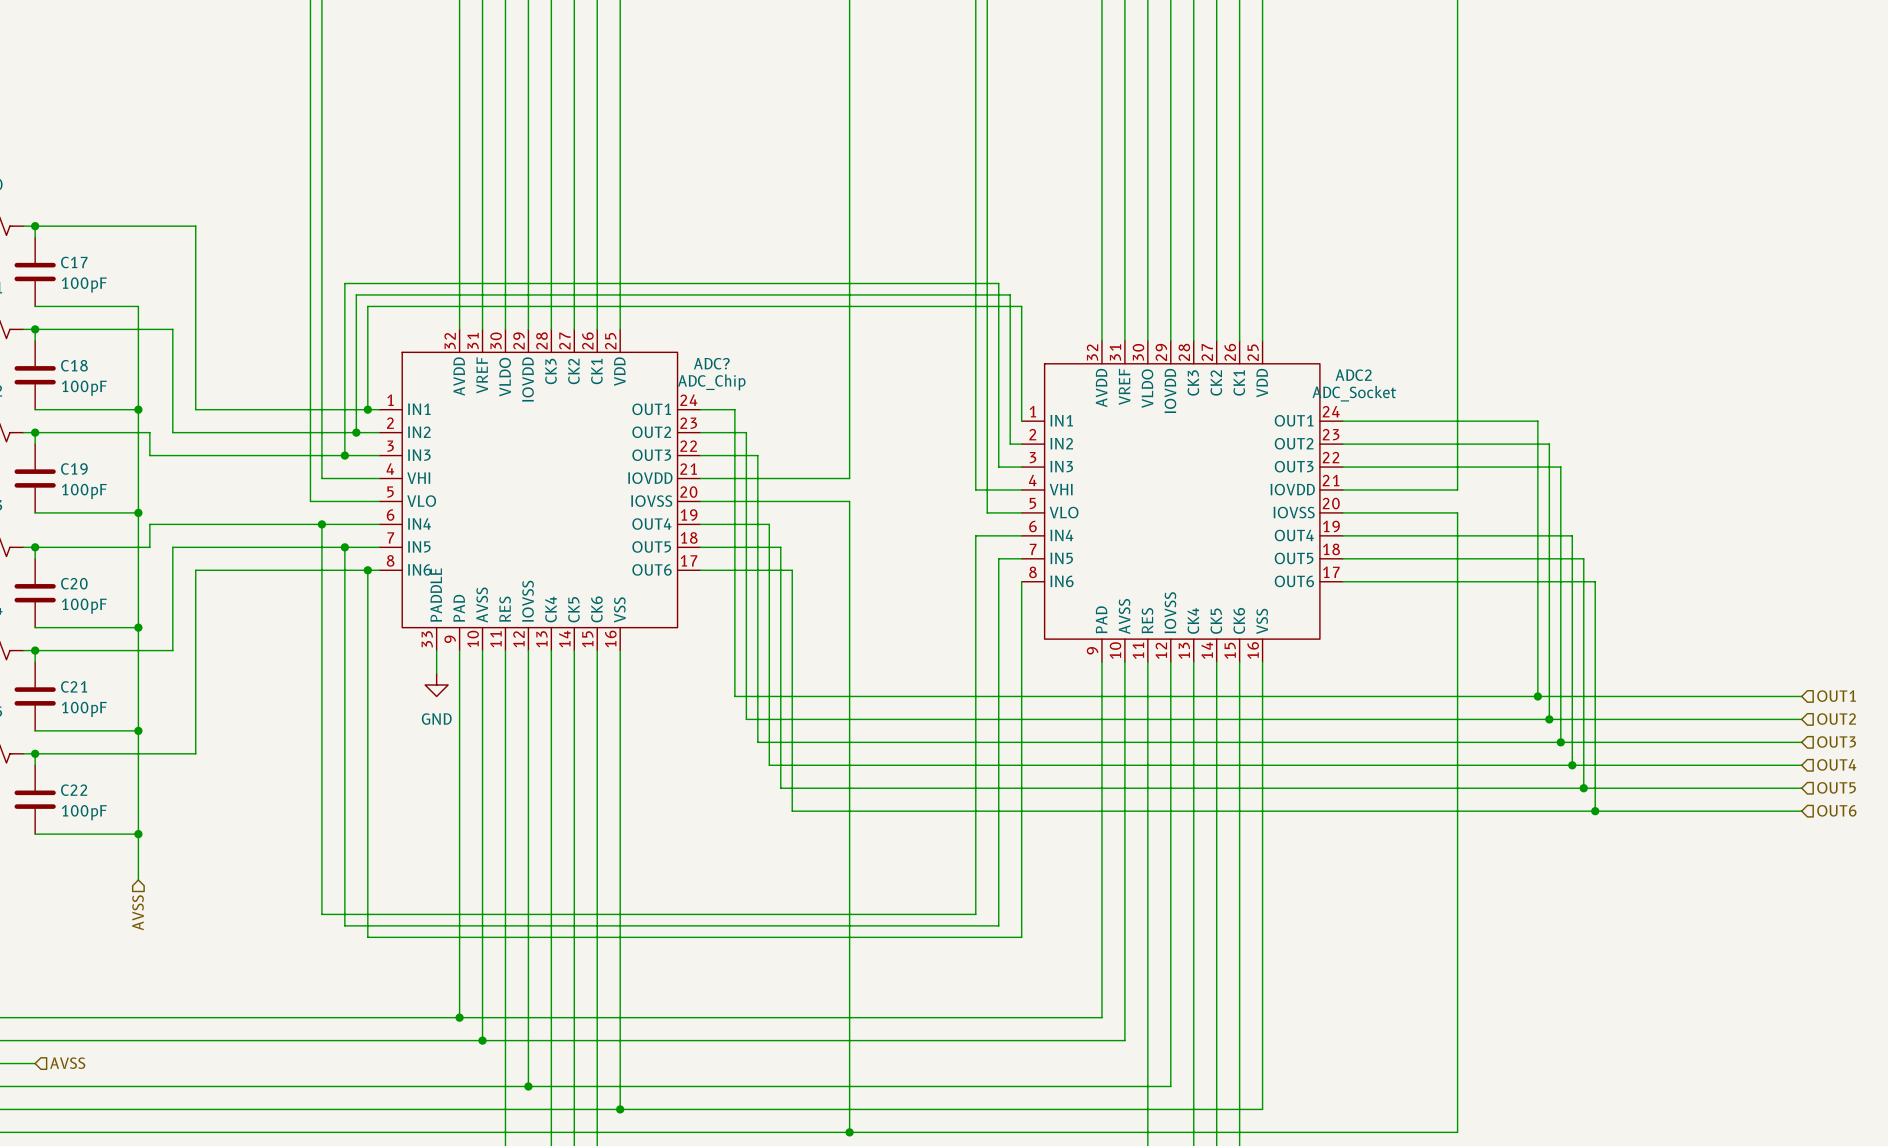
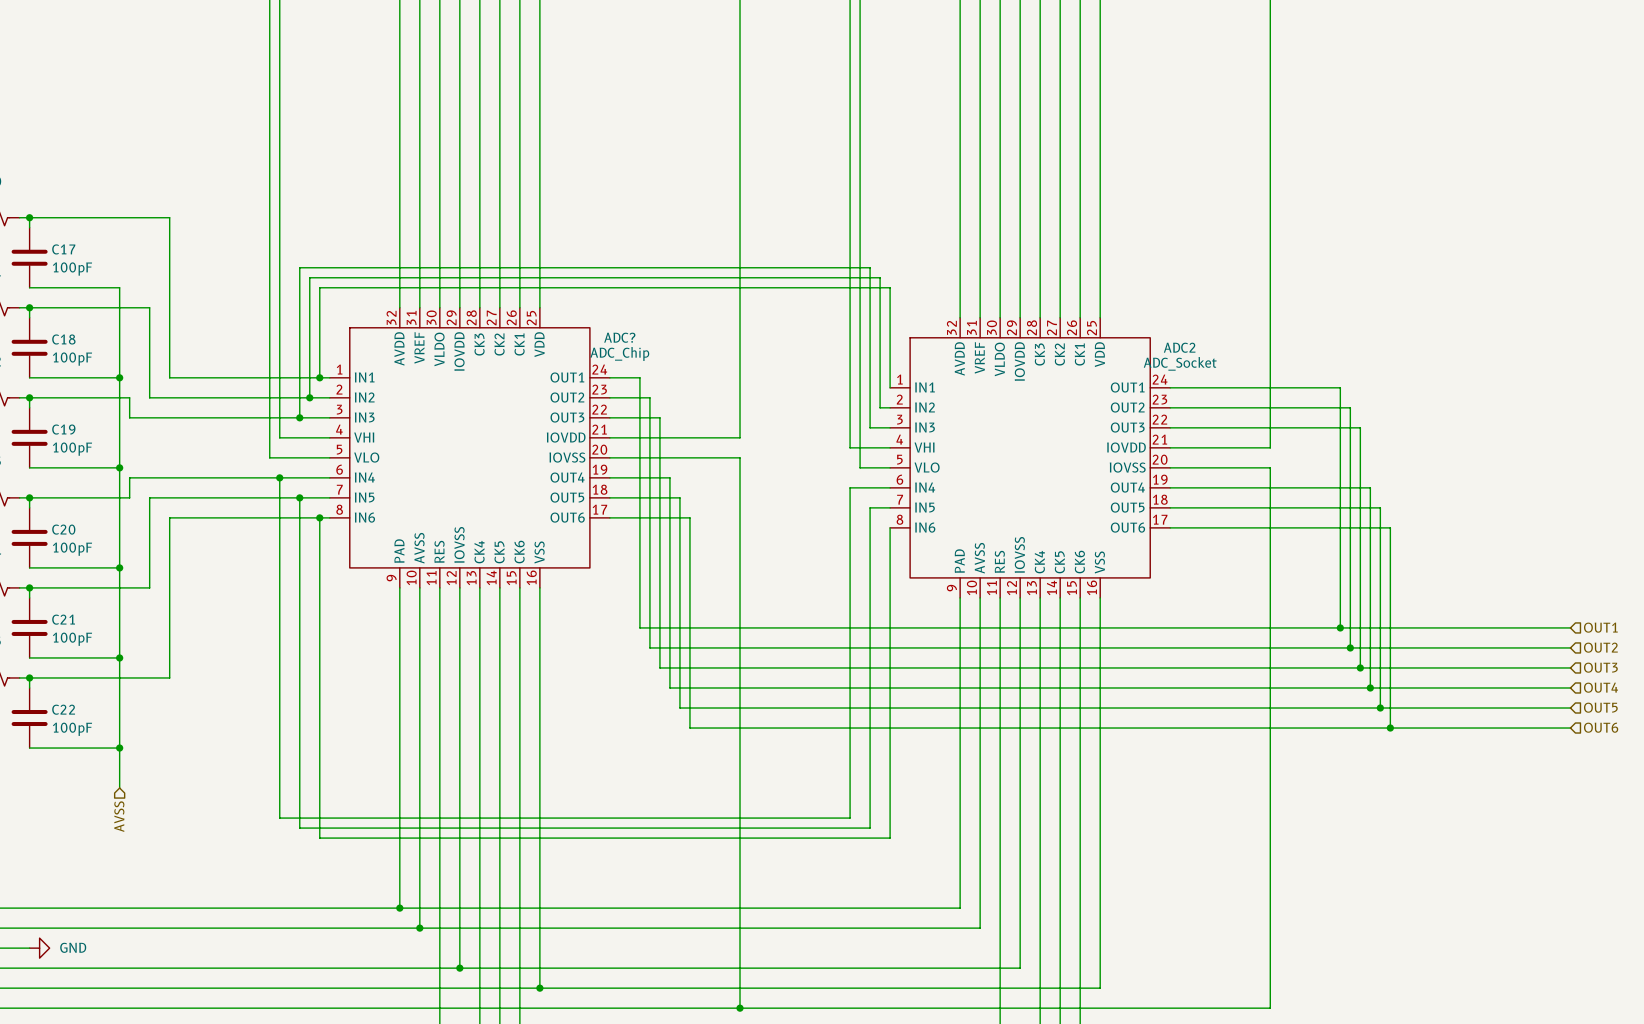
ADC? symbol: [379, 329, 701, 651] -> [329, 307, 610, 588]
wire: (436, 650) (436, 673) -> none
power symbol: GND (436, 684) -> none
power symbol: none -> GND (39, 948)
hierarchical label: AVSS (67, 1063) -> none

